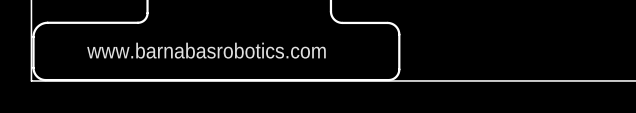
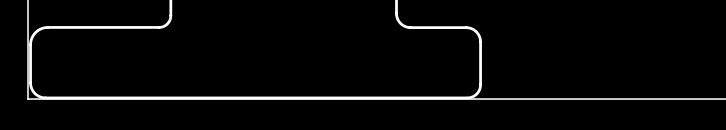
text: www.barnabasrobotics.com (206, 50) -> none

